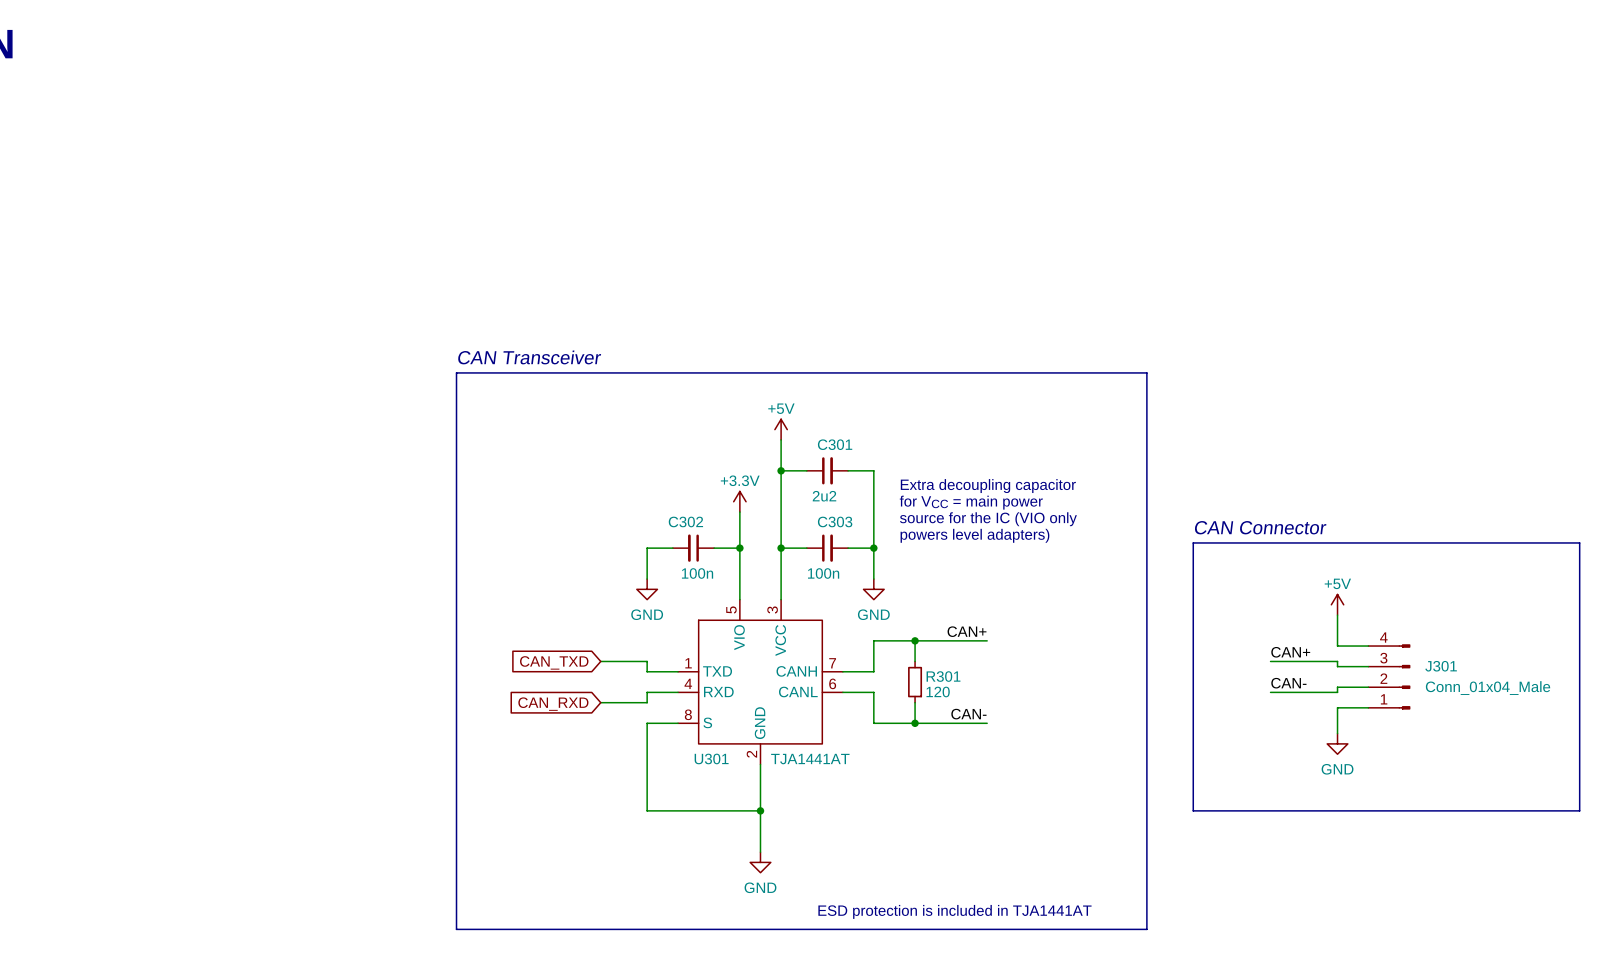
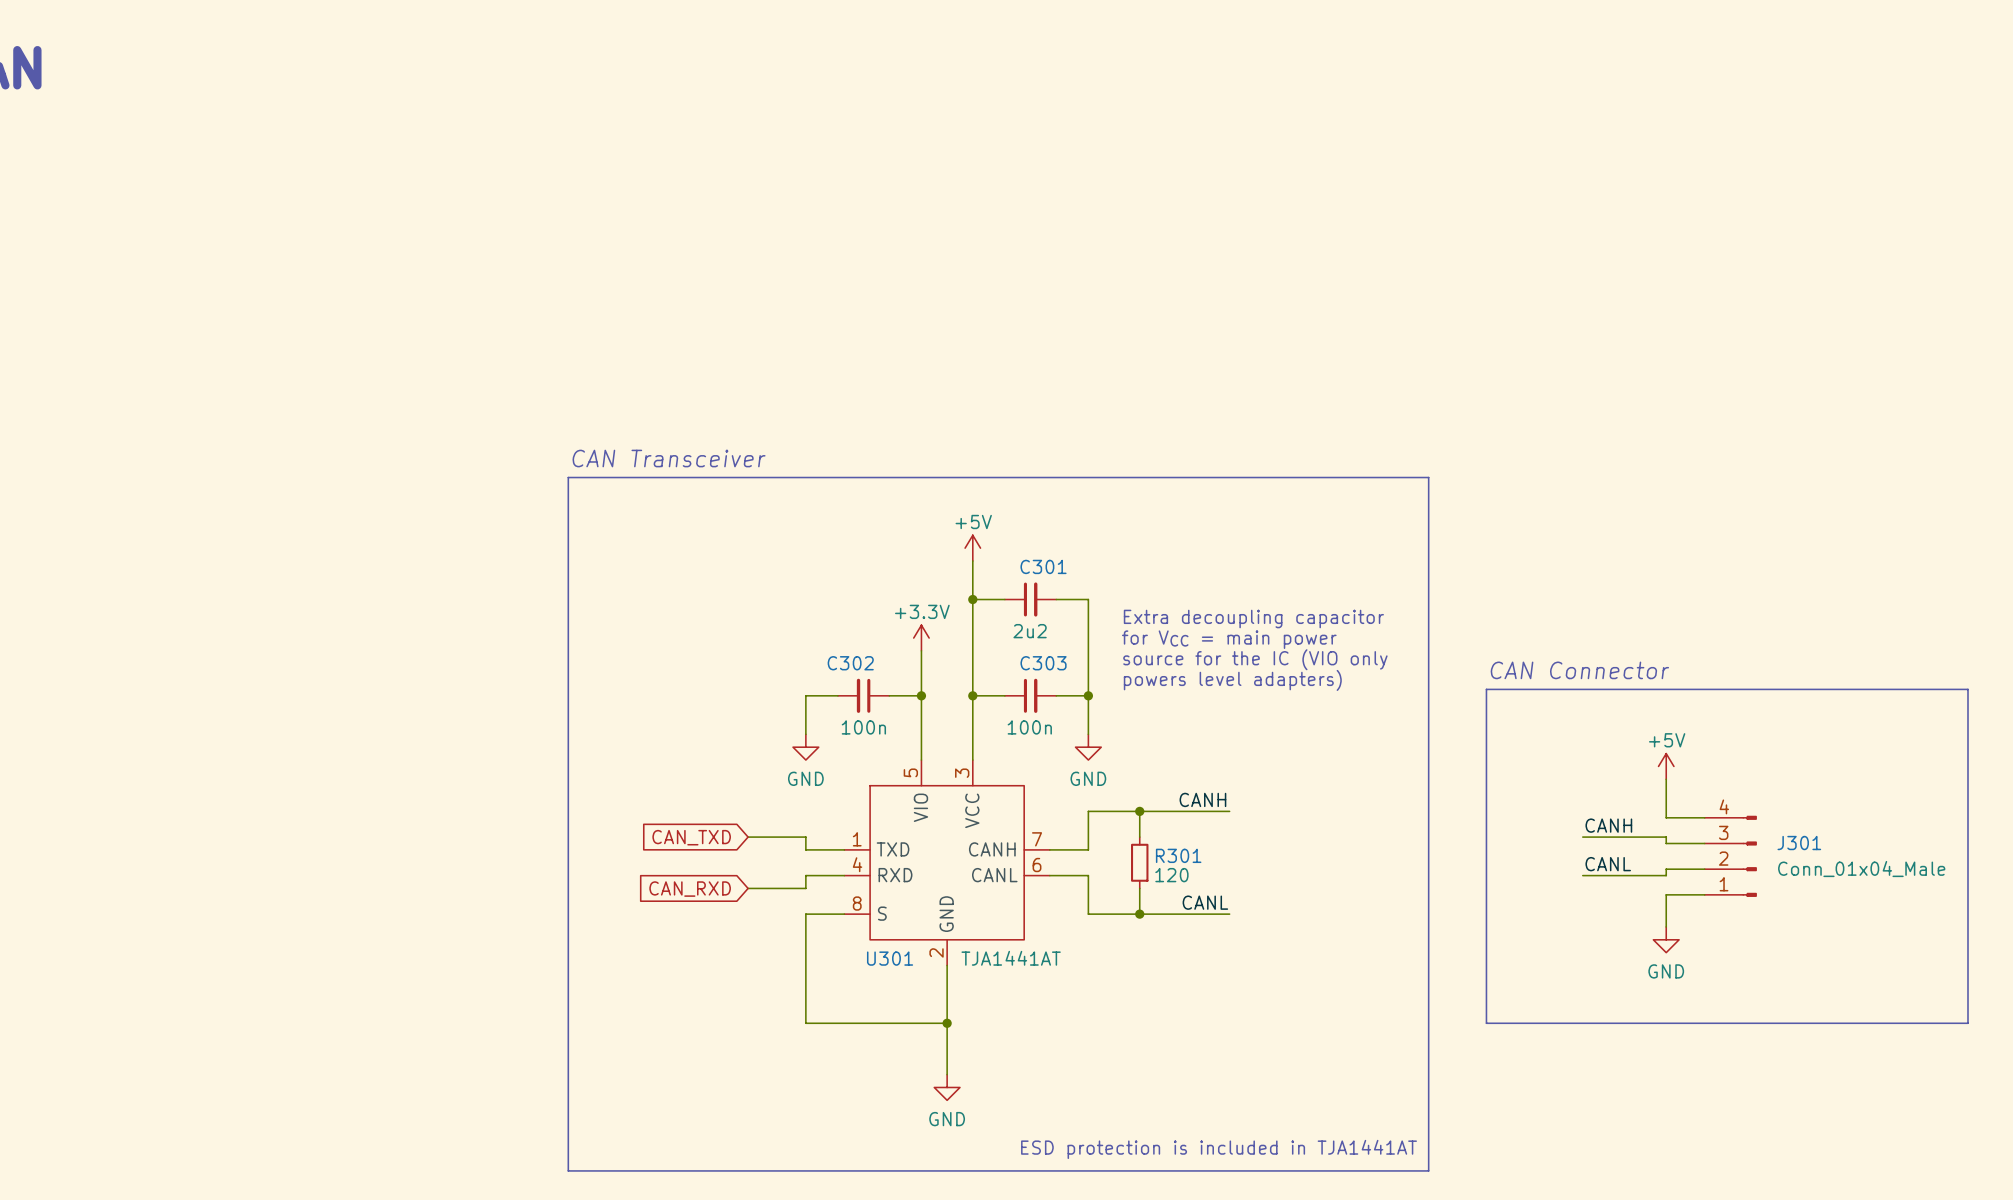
label: CAN+ (967, 631) -> CANH (1202, 799)
label: CAN+ (1290, 652) -> CANH (1608, 825)
label: CAN- (1288, 683) -> CANL (1608, 864)
label: CAN- (968, 714) -> CANL (1205, 902)

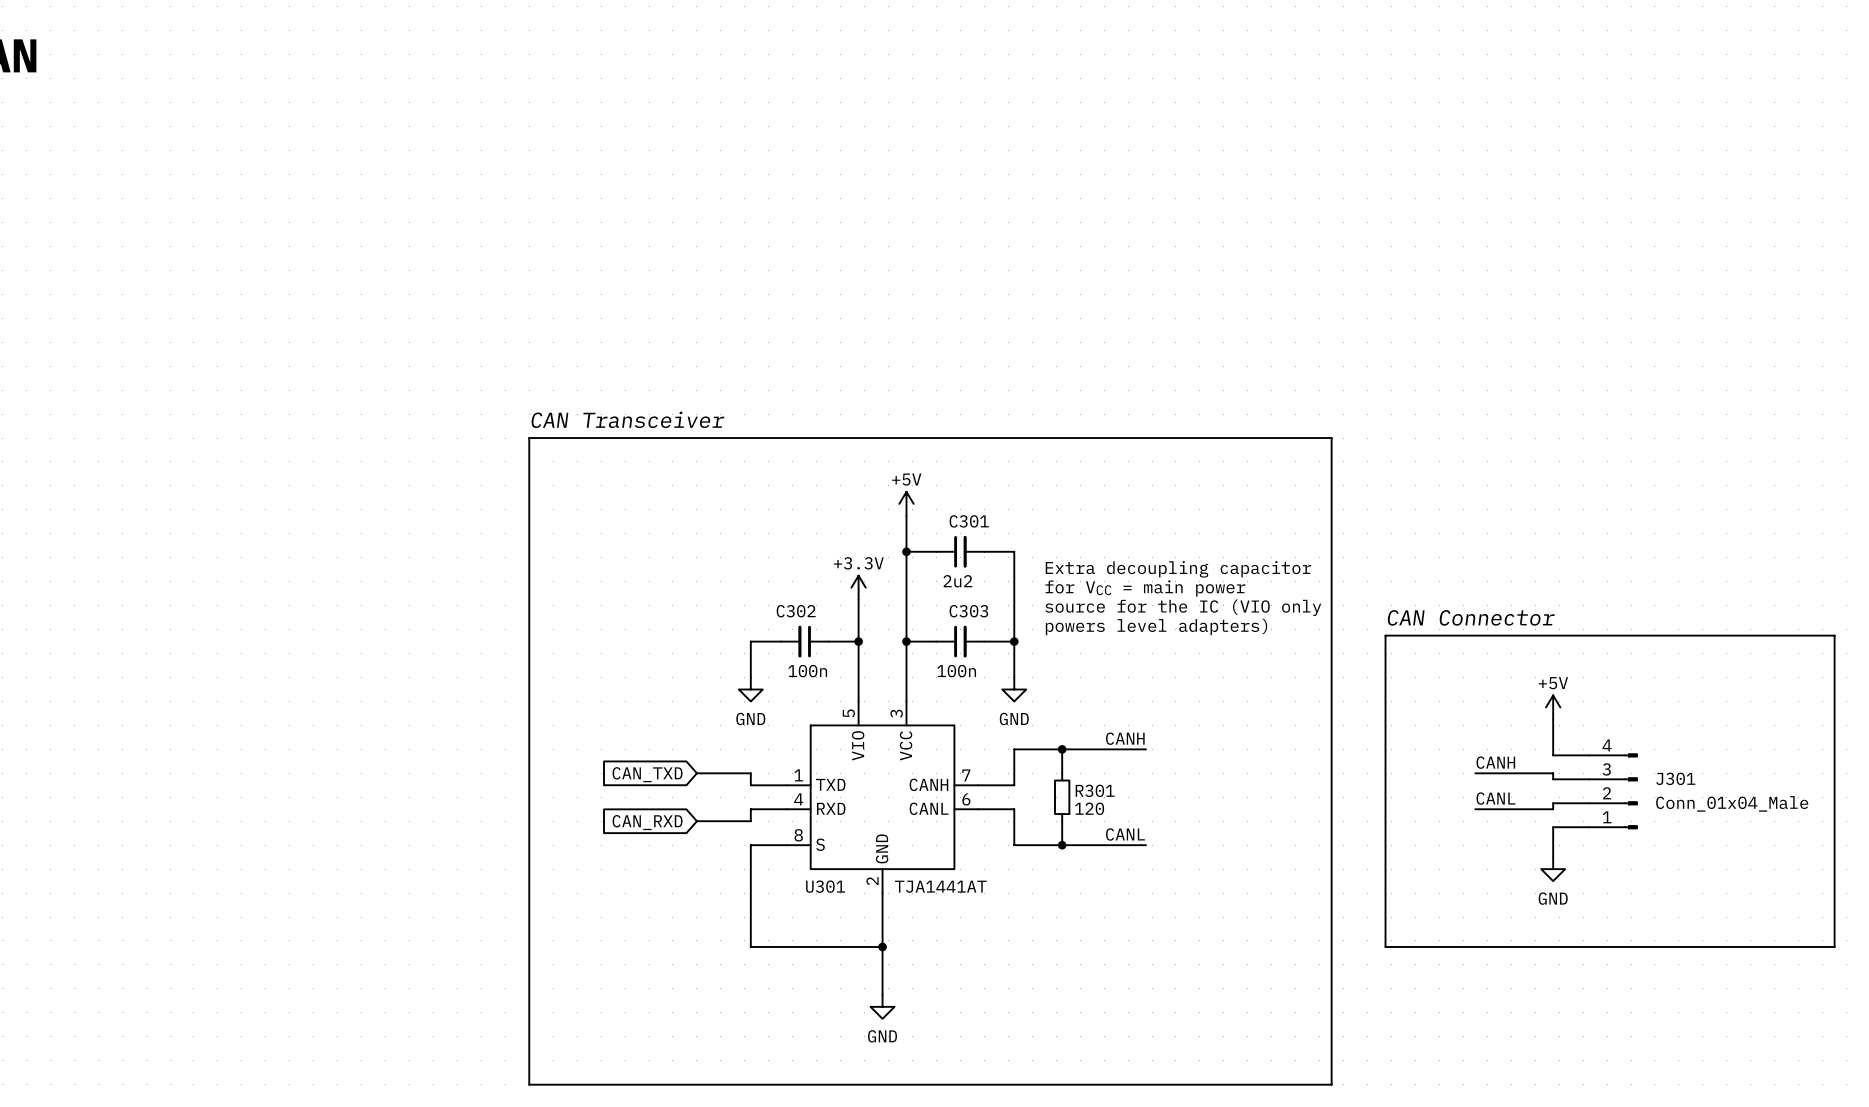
text: ESD protection is included in TJA1441AT (1219, 1149) -> none

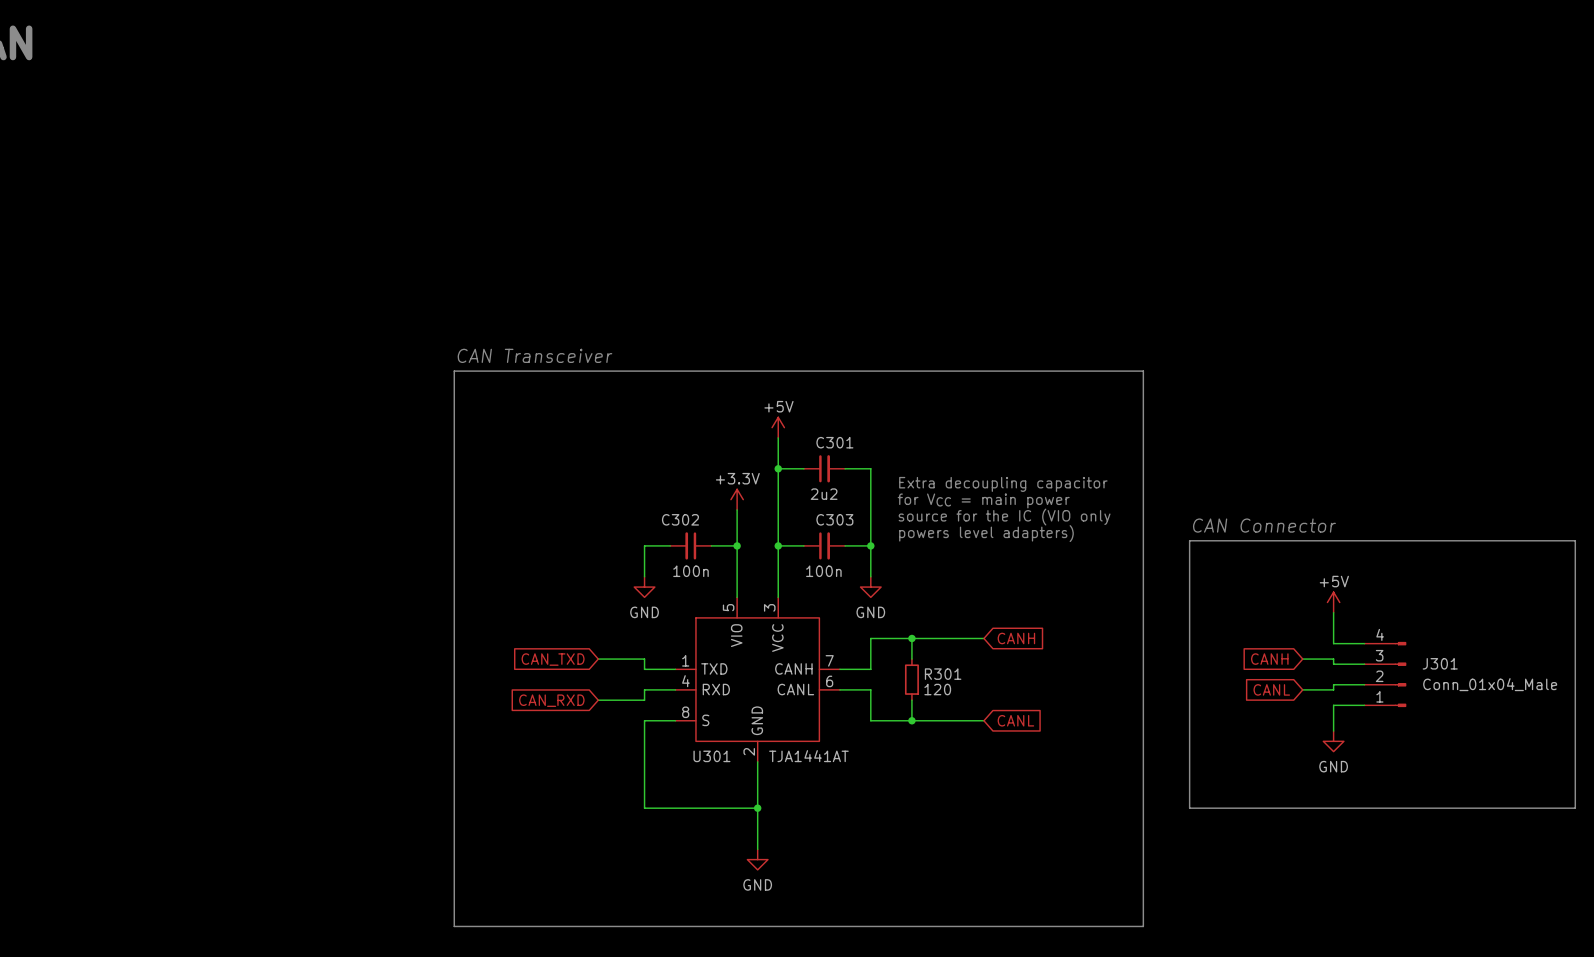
label: CANH (1125, 738) -> none
global label: none -> CANH (1016, 638)
label: CANH (1495, 762) -> none
wire: (1475, 773) (1517, 773) -> none
global label: none -> CANH (1269, 659)
label: CANL (1495, 798) -> none
wire: (1475, 809) (1517, 809) -> none
global label: none -> CANL (1271, 689)
label: CANL (1125, 834) -> none
global label: none -> CANL (1015, 720)

